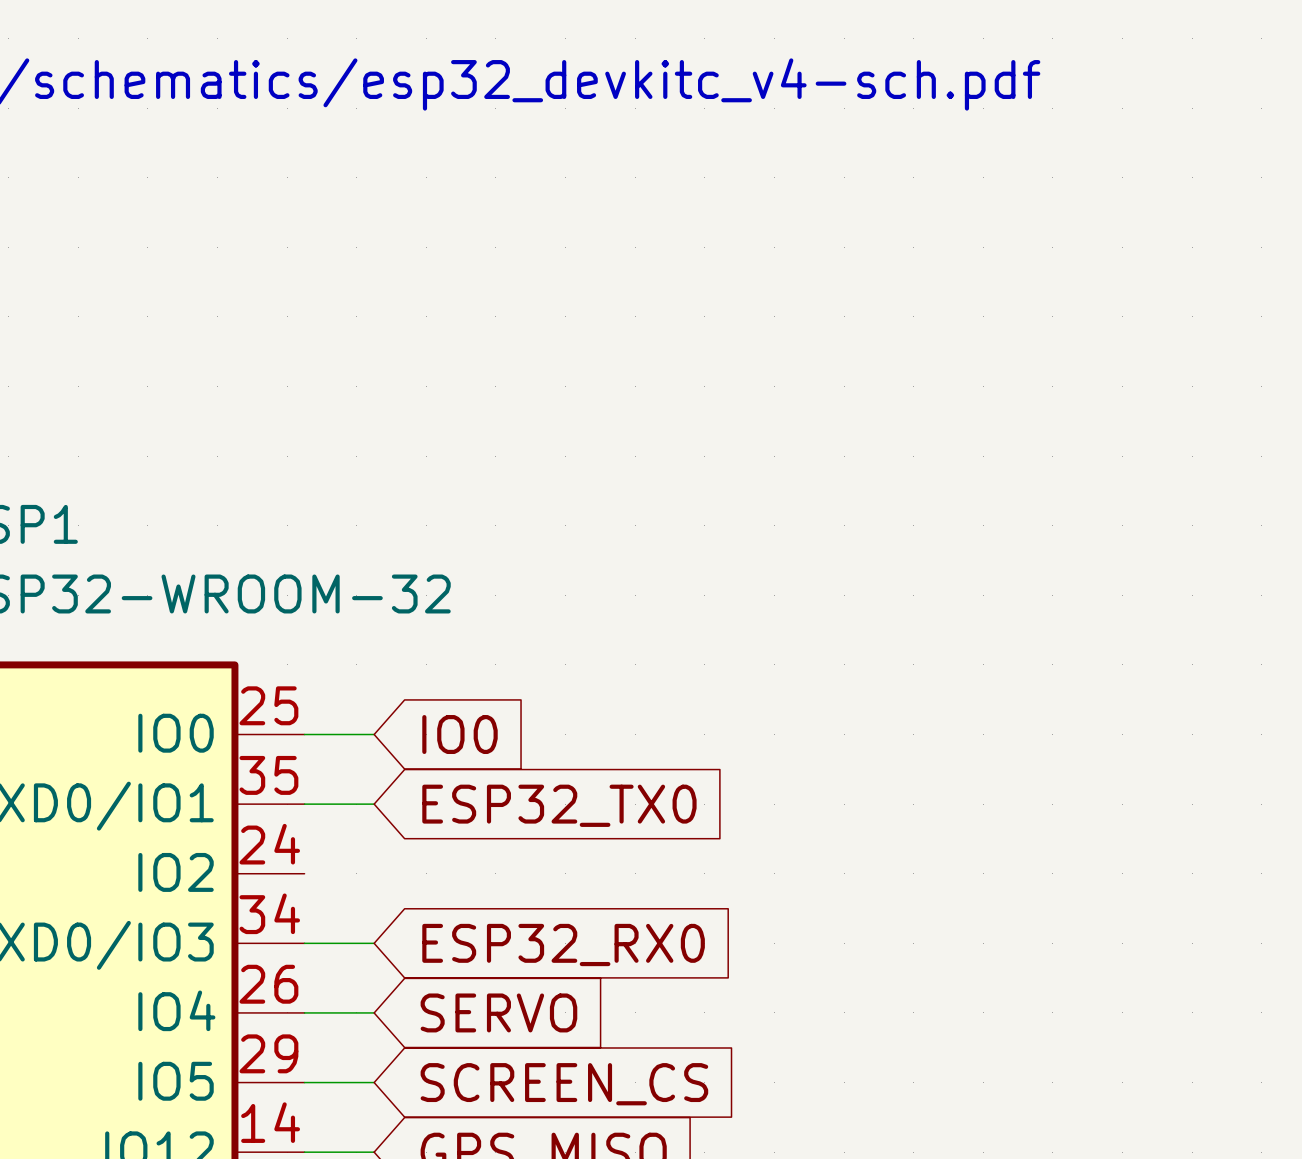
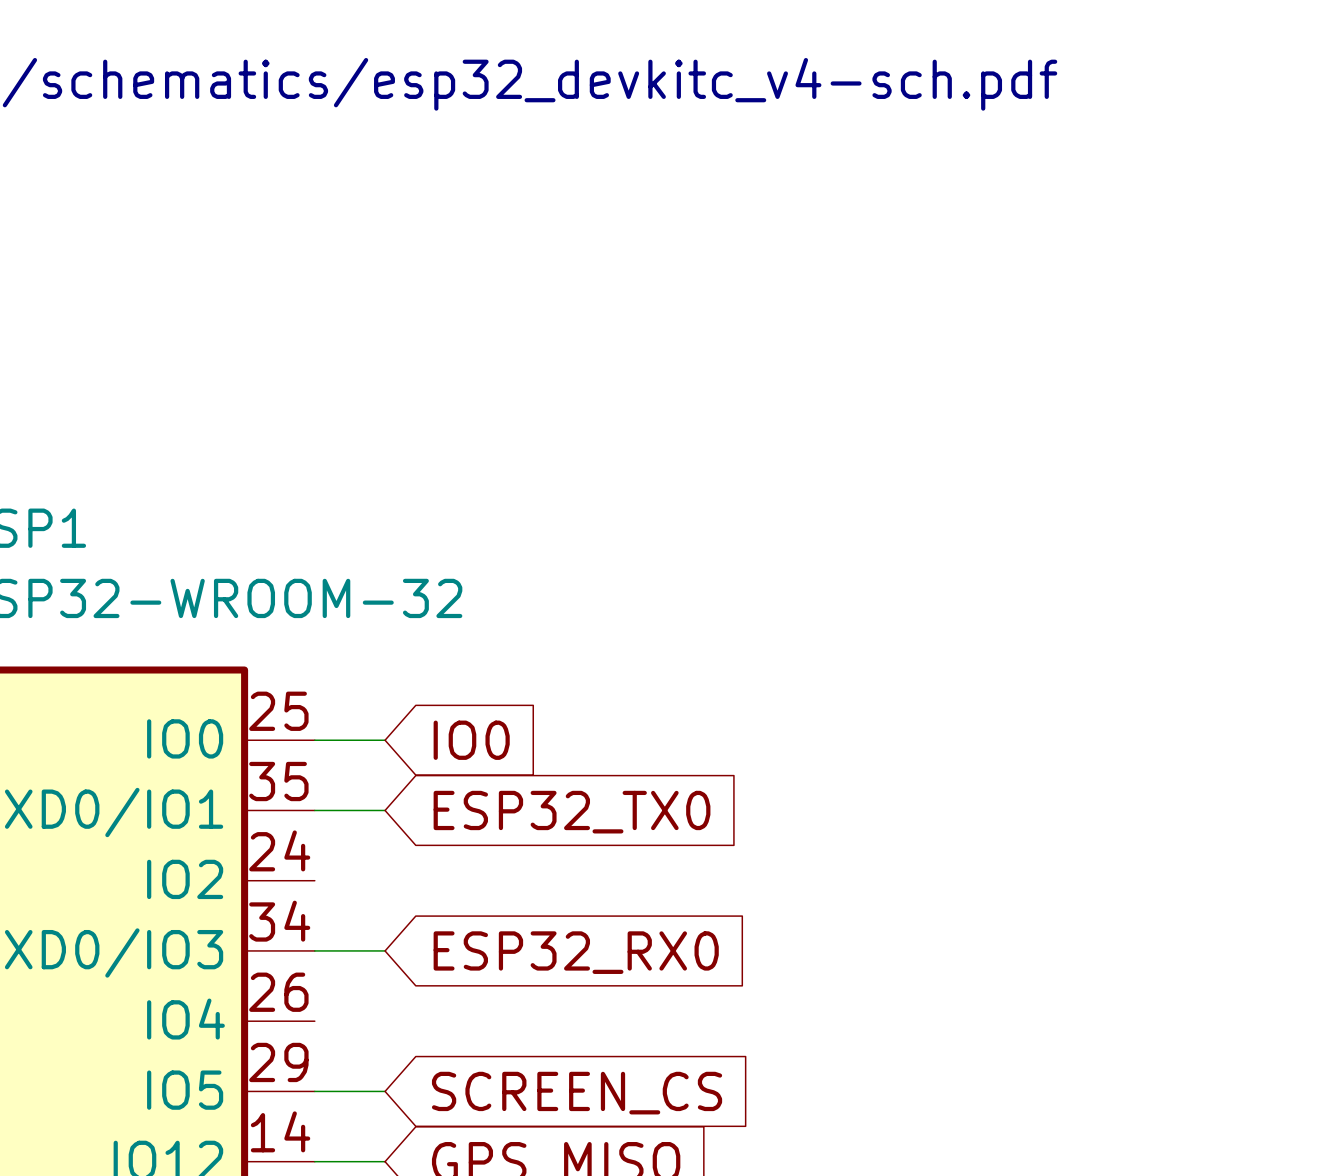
wire: (304, 1012) (374, 1012) -> none
global label: SERVO (498, 1012) -> none

